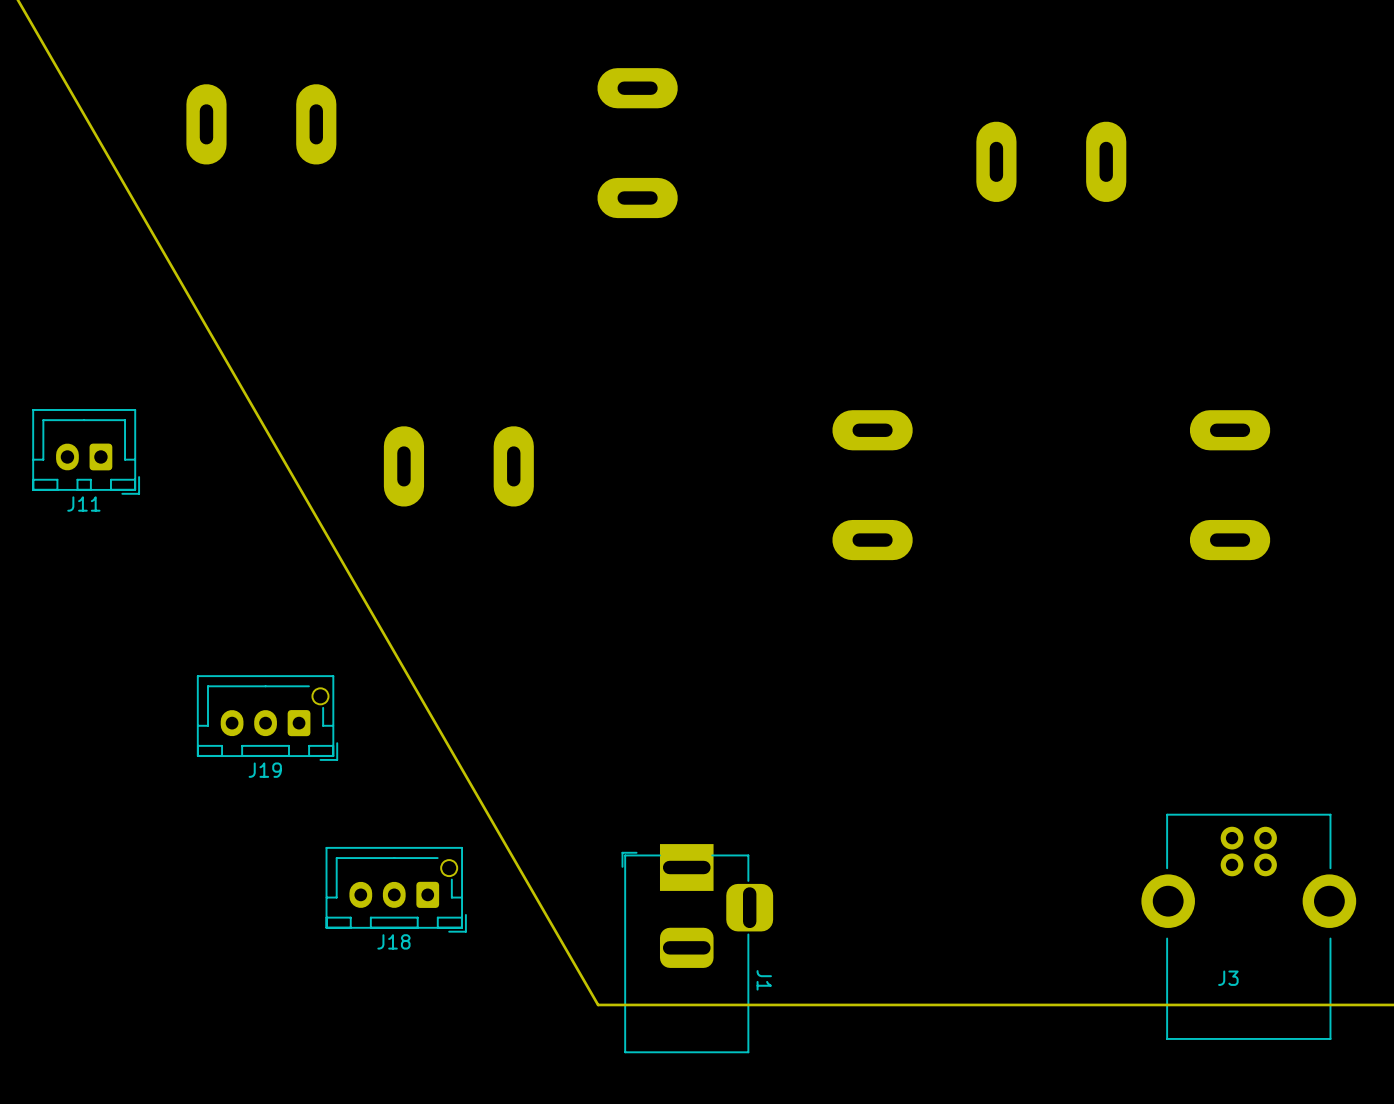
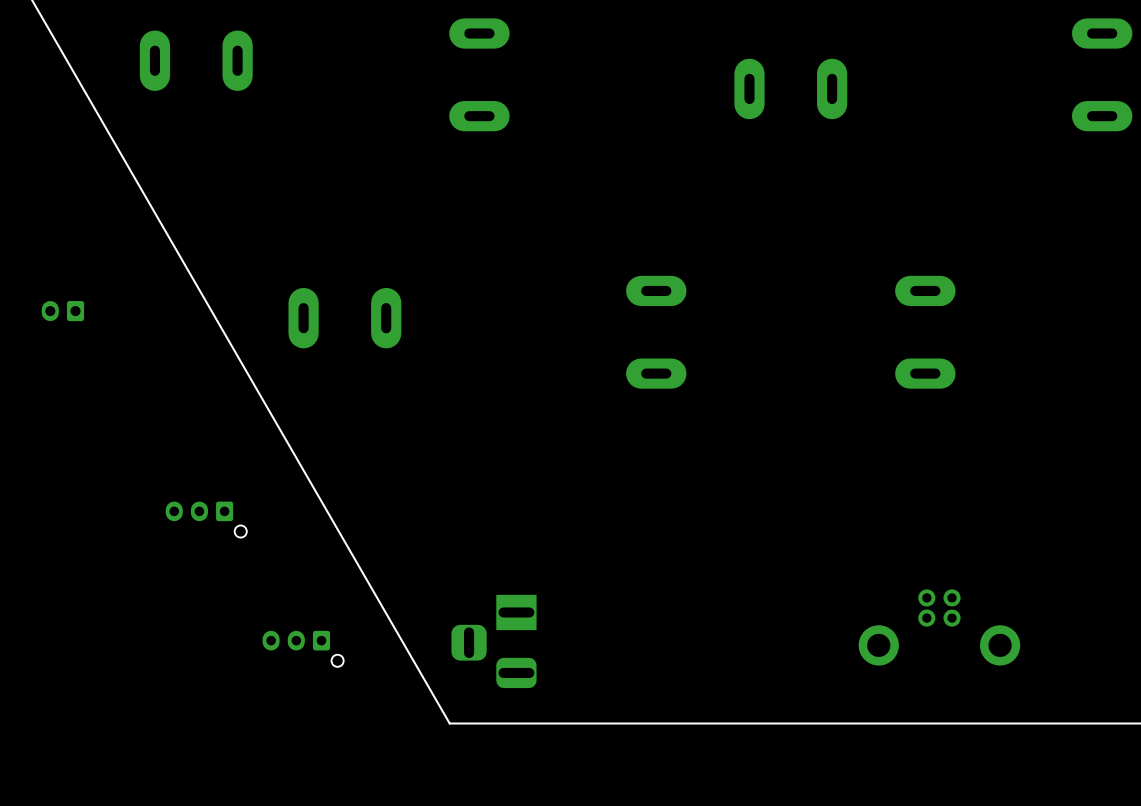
J11 side: bottom (86, 451) -> top (62, 311)
J19 side: bottom (267, 718) -> top (206, 519)
J18 side: bottom (396, 889) -> top (303, 648)
J3 side: bottom (1248, 926) -> top (939, 627)
J1 side: bottom (697, 948) -> top (494, 641)

